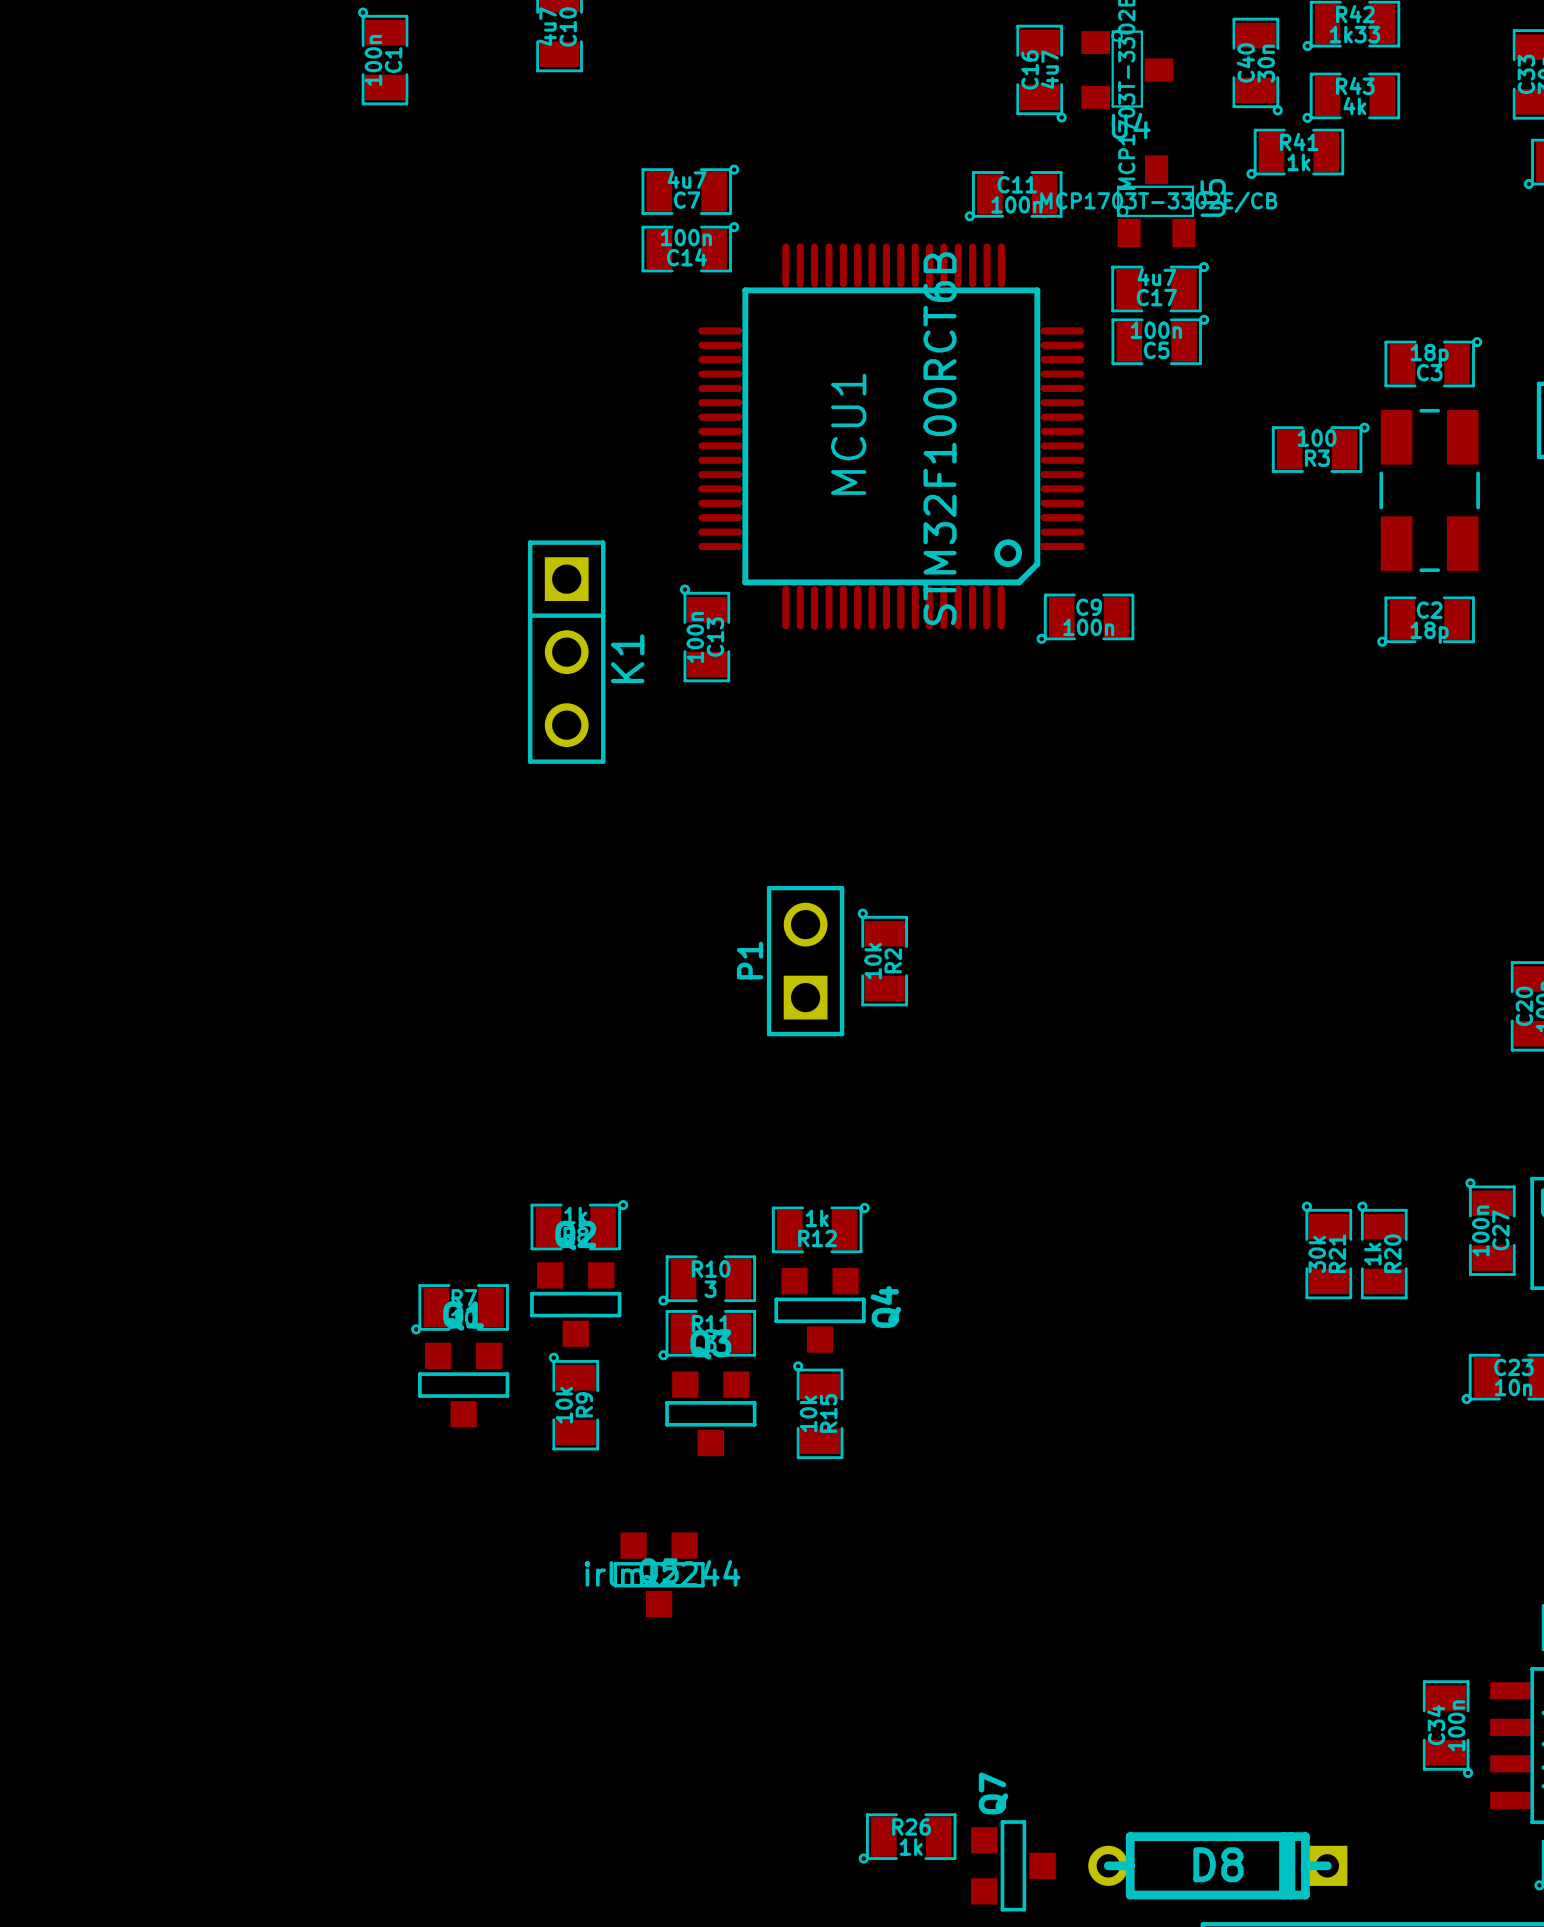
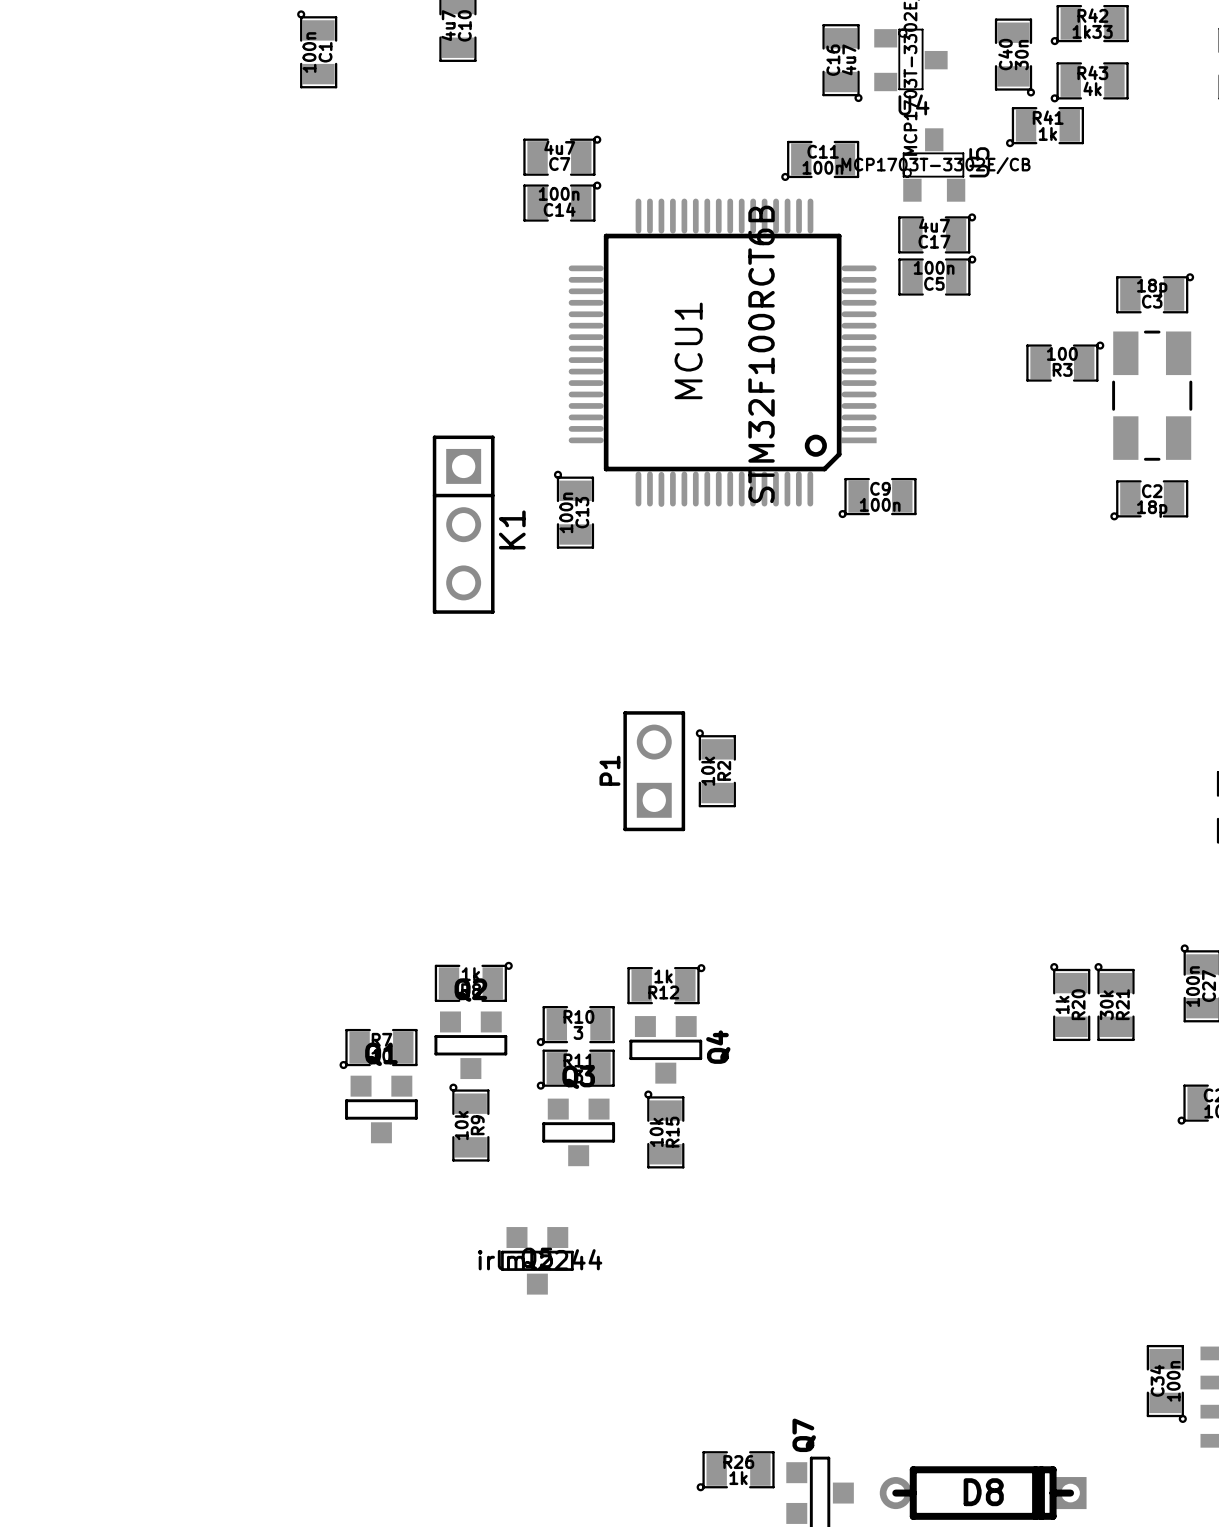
R21 name: R21 (1337, 1253) -> R20 (1078, 1004)
R20 name: R20 (1392, 1253) -> R21 (1122, 1004)
R21 value: 30k (1317, 1254) -> 1k (1062, 1004)
R20 value: 1k (1372, 1254) -> 30k (1106, 1005)

